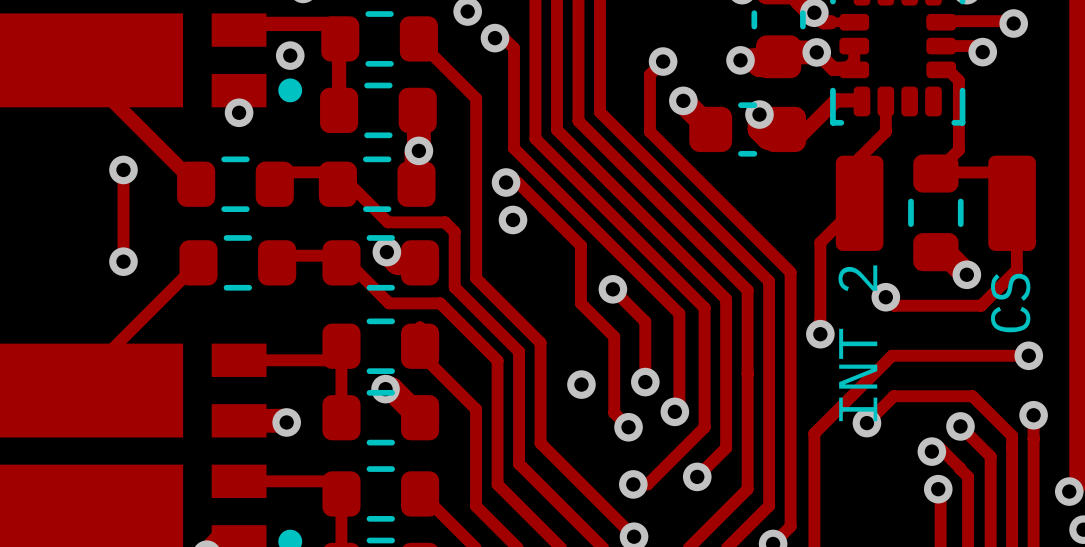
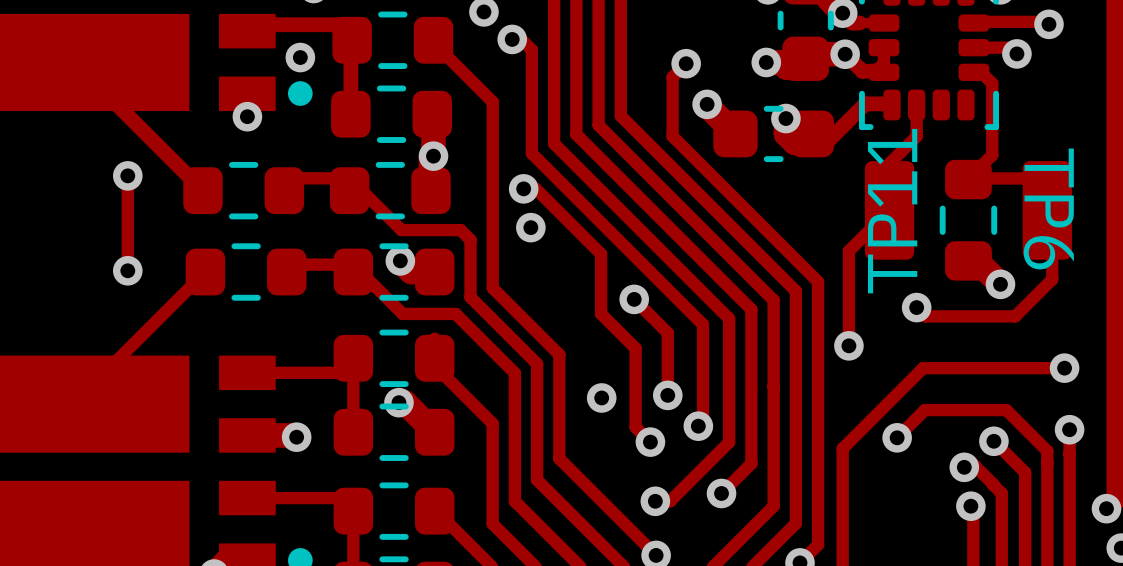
CS name: CS (1010, 303) -> TP6 (1048, 208)
INT 2 name: INT 2 (857, 343) -> TP11 (892, 211)

